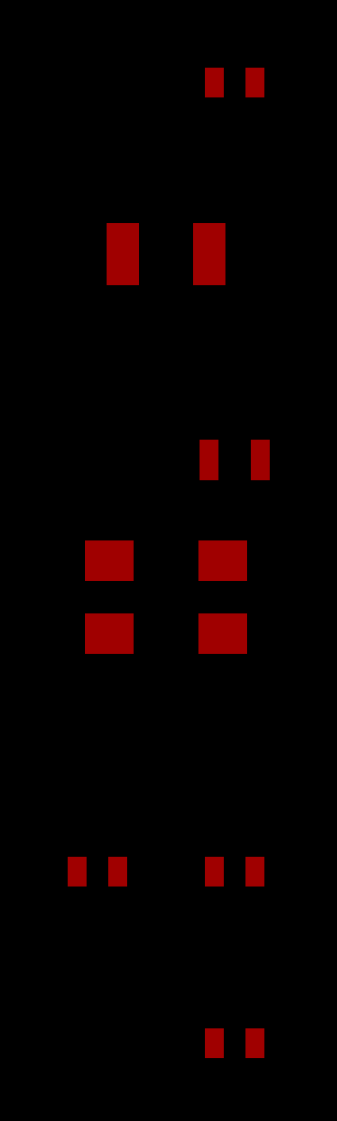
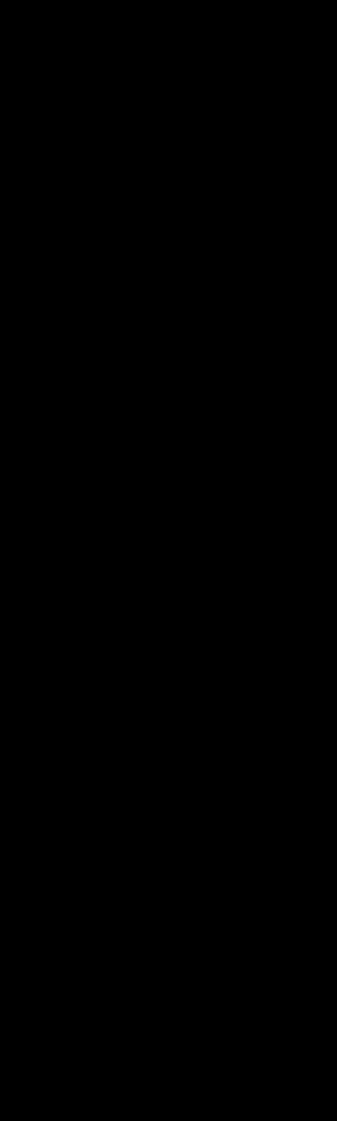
part: (234, 82) -> none
part: (166, 254) -> none
part: (234, 459) -> none
part: (166, 597) -> none
part: (97, 871) -> none
part: (234, 871) -> none
part: (234, 1043) -> none

